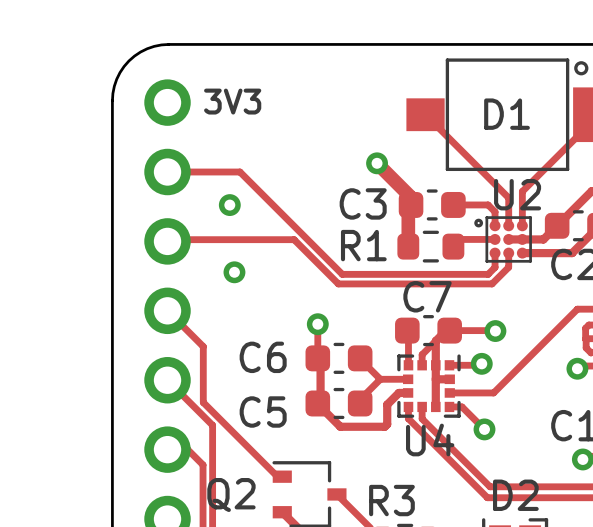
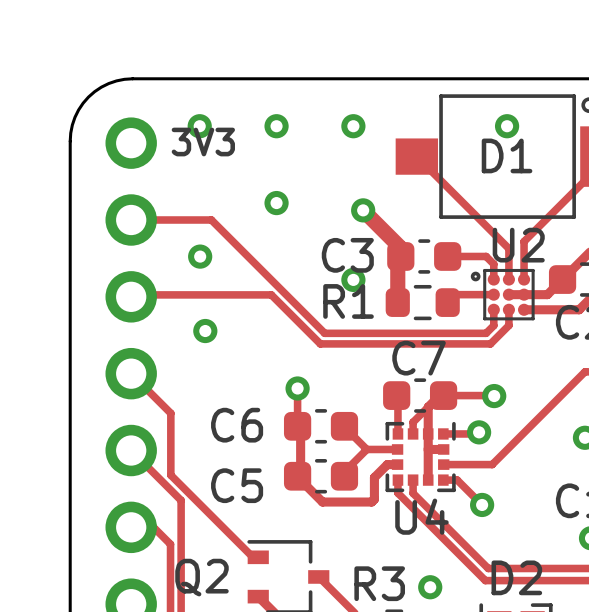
via: none -> (199, 126)
via: none -> (276, 126)
via: none -> (353, 126)
via: none -> (507, 126)
via: none -> (276, 203)
via: none -> (353, 279)
via: none -> (430, 587)

